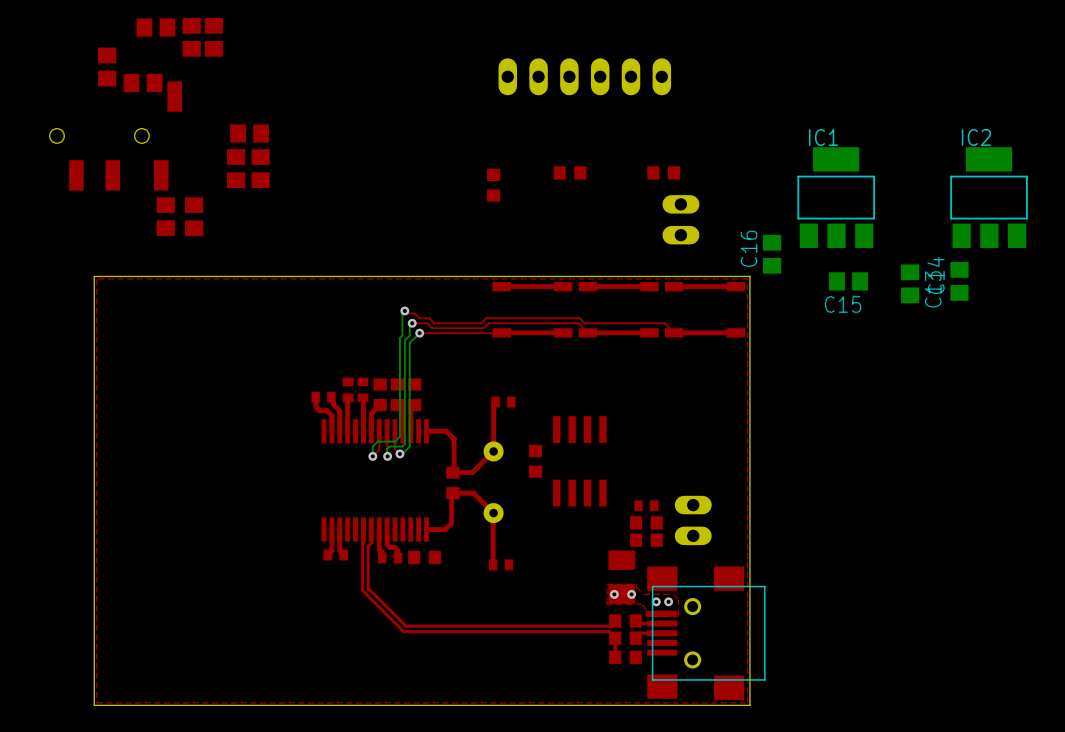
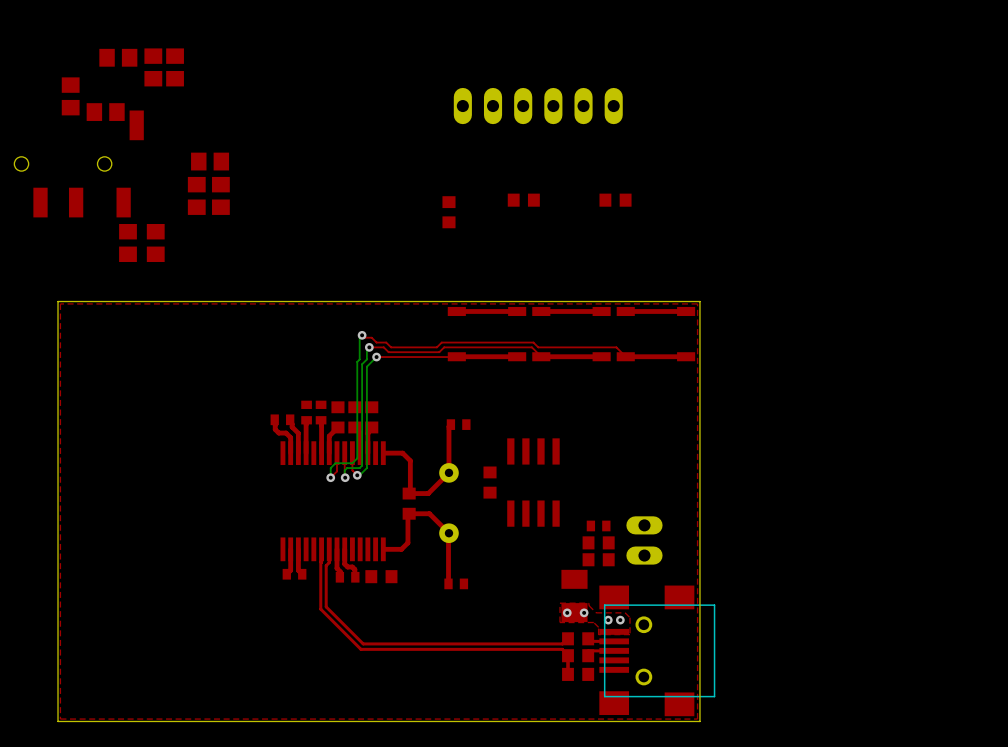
IC1: (836, 197) -> none
IC2: (989, 197) -> none
part: (680, 219) -> none
C16: (772, 254) -> none
C15: (848, 281) -> none
C14: (959, 281) -> none
C13: (910, 283) -> none

